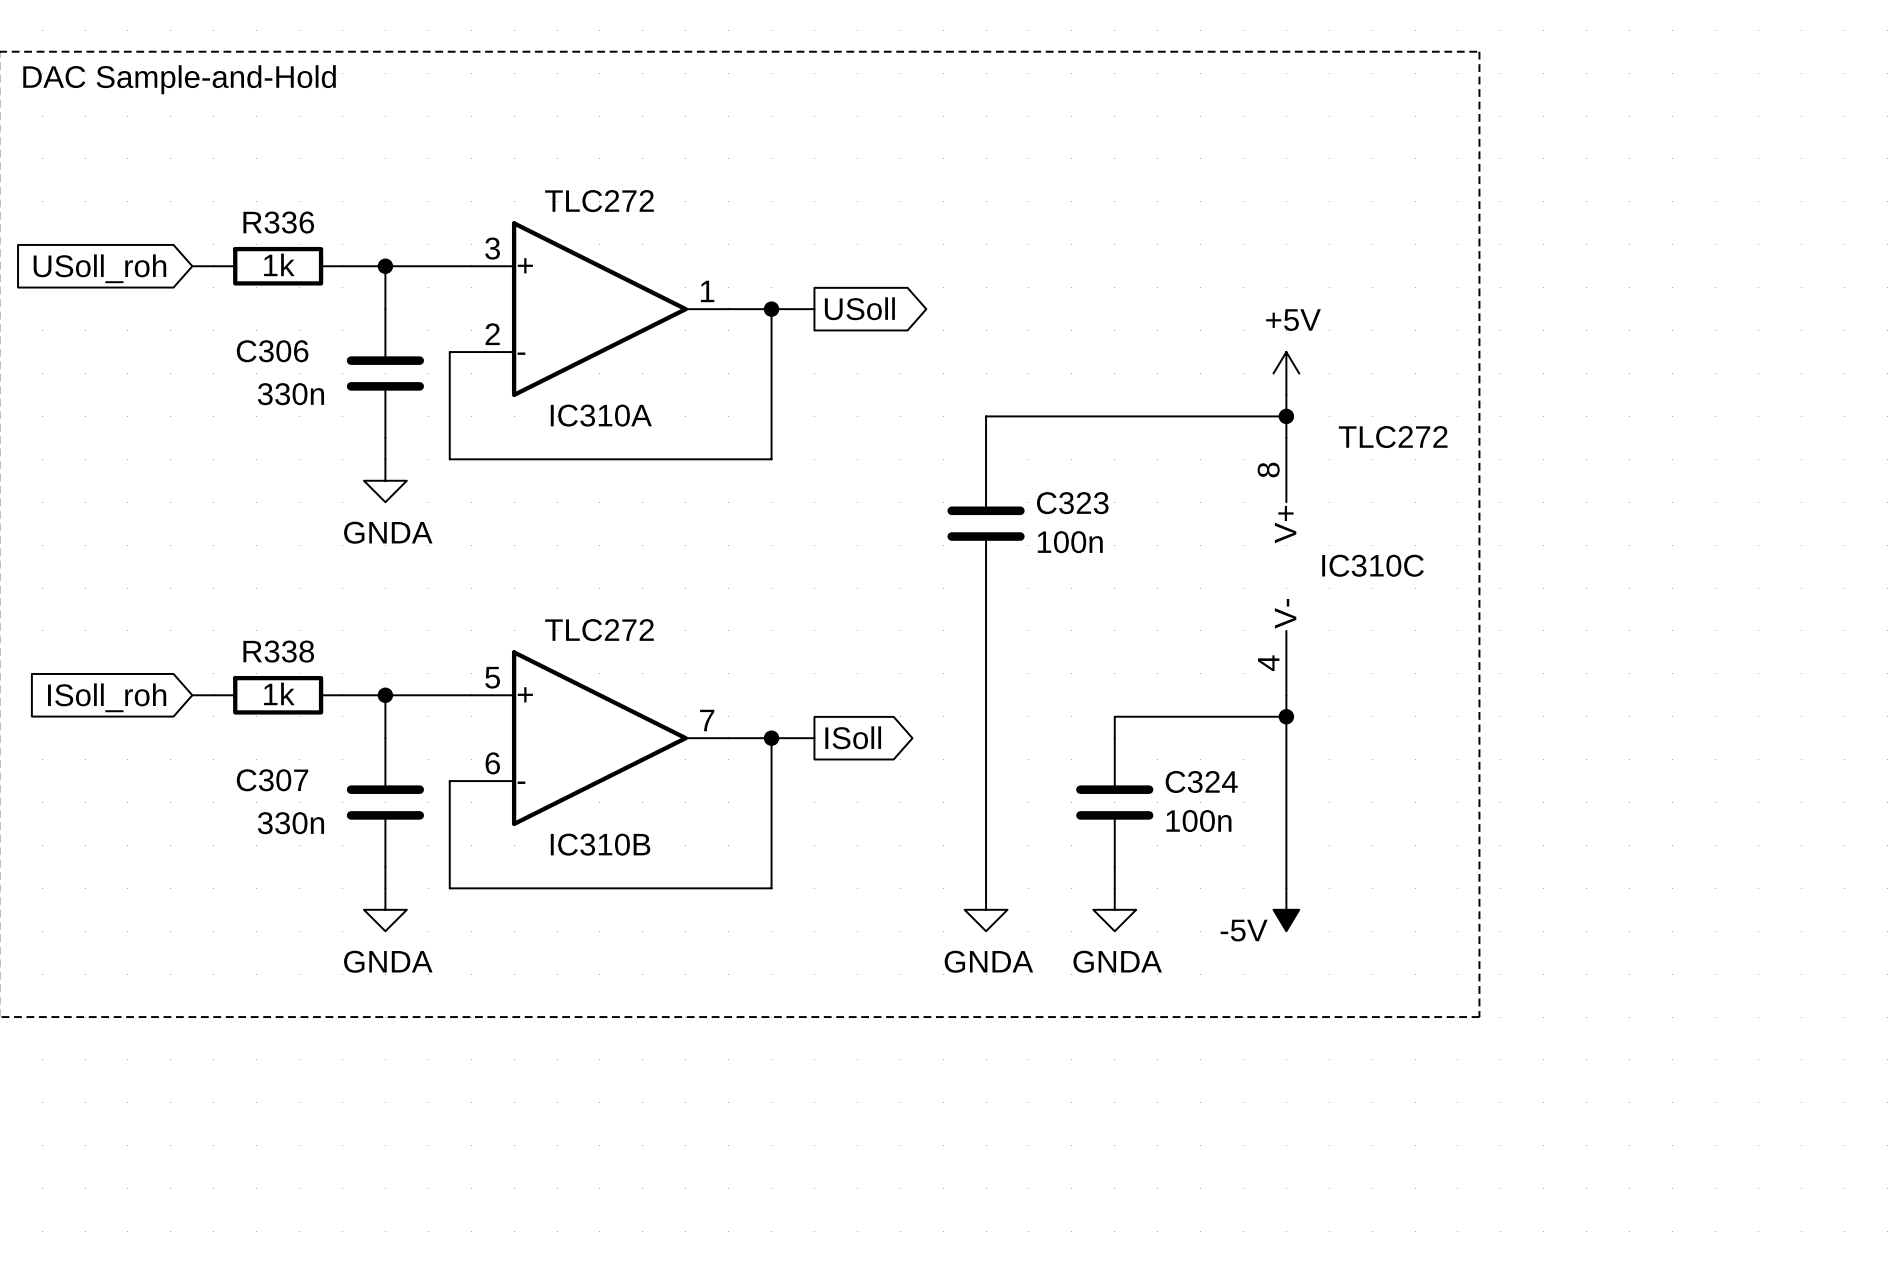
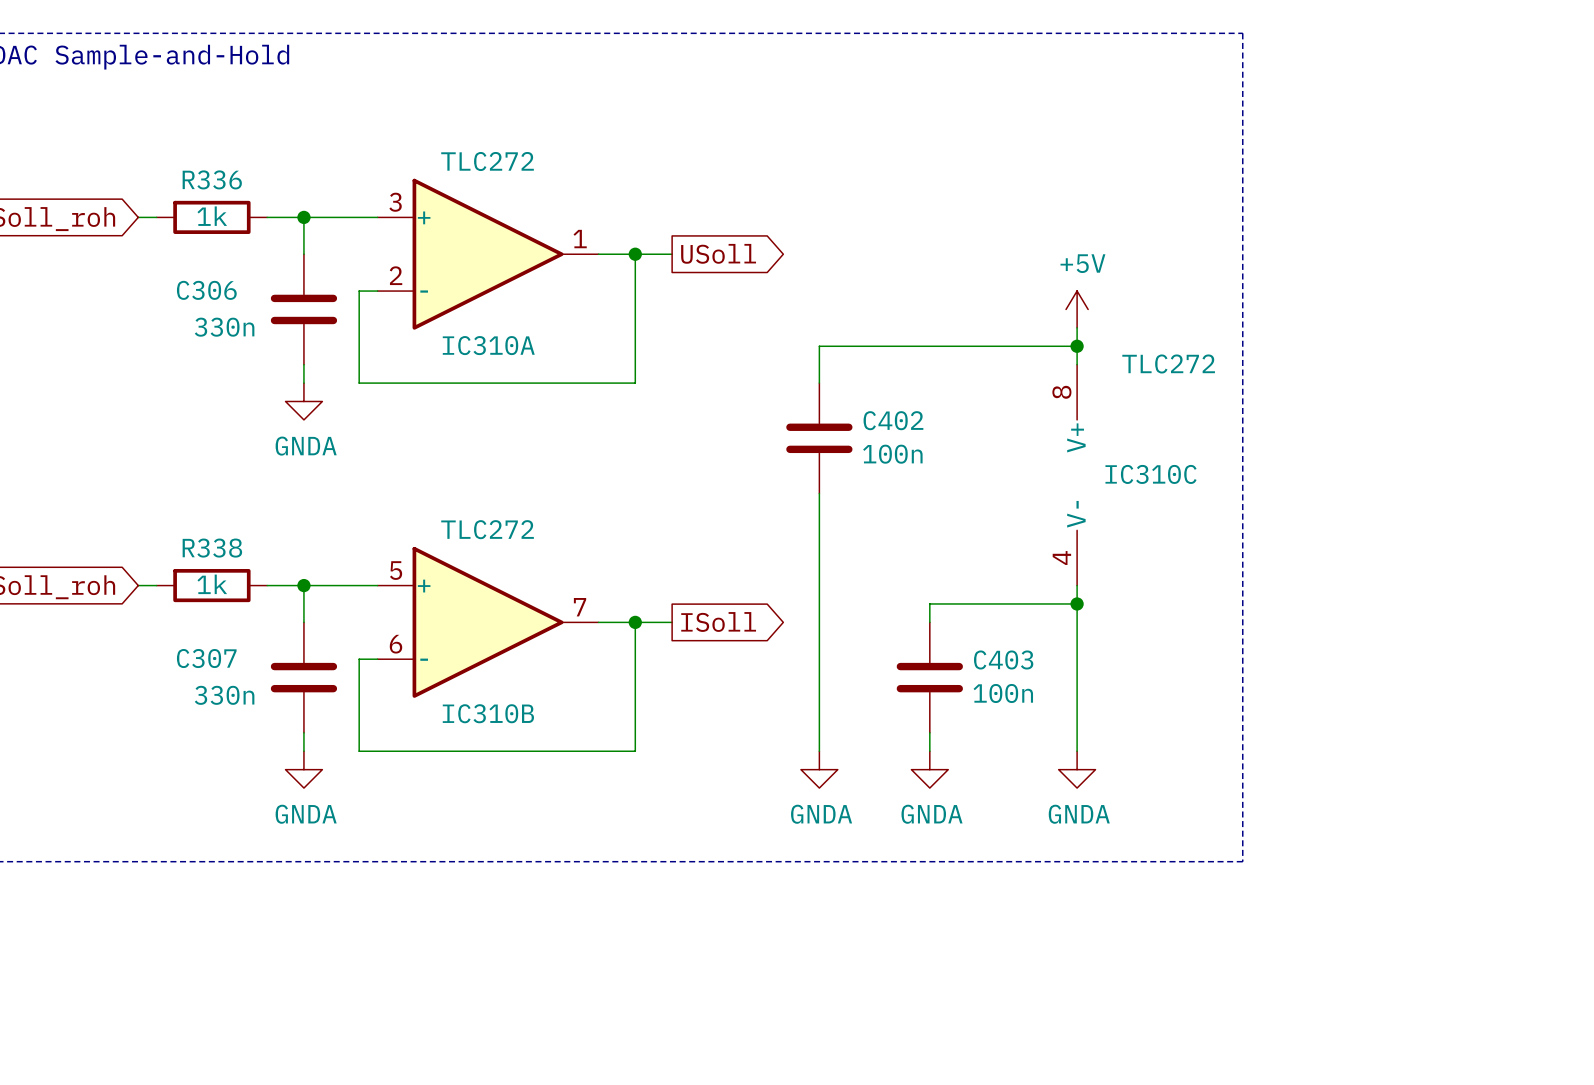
C323 name: C323 (1072, 503) -> C402 (893, 420)
C324 name: C324 (1201, 781) -> C403 (1003, 659)
power symbol: -5V (1286, 909) -> GNDA (1077, 769)

